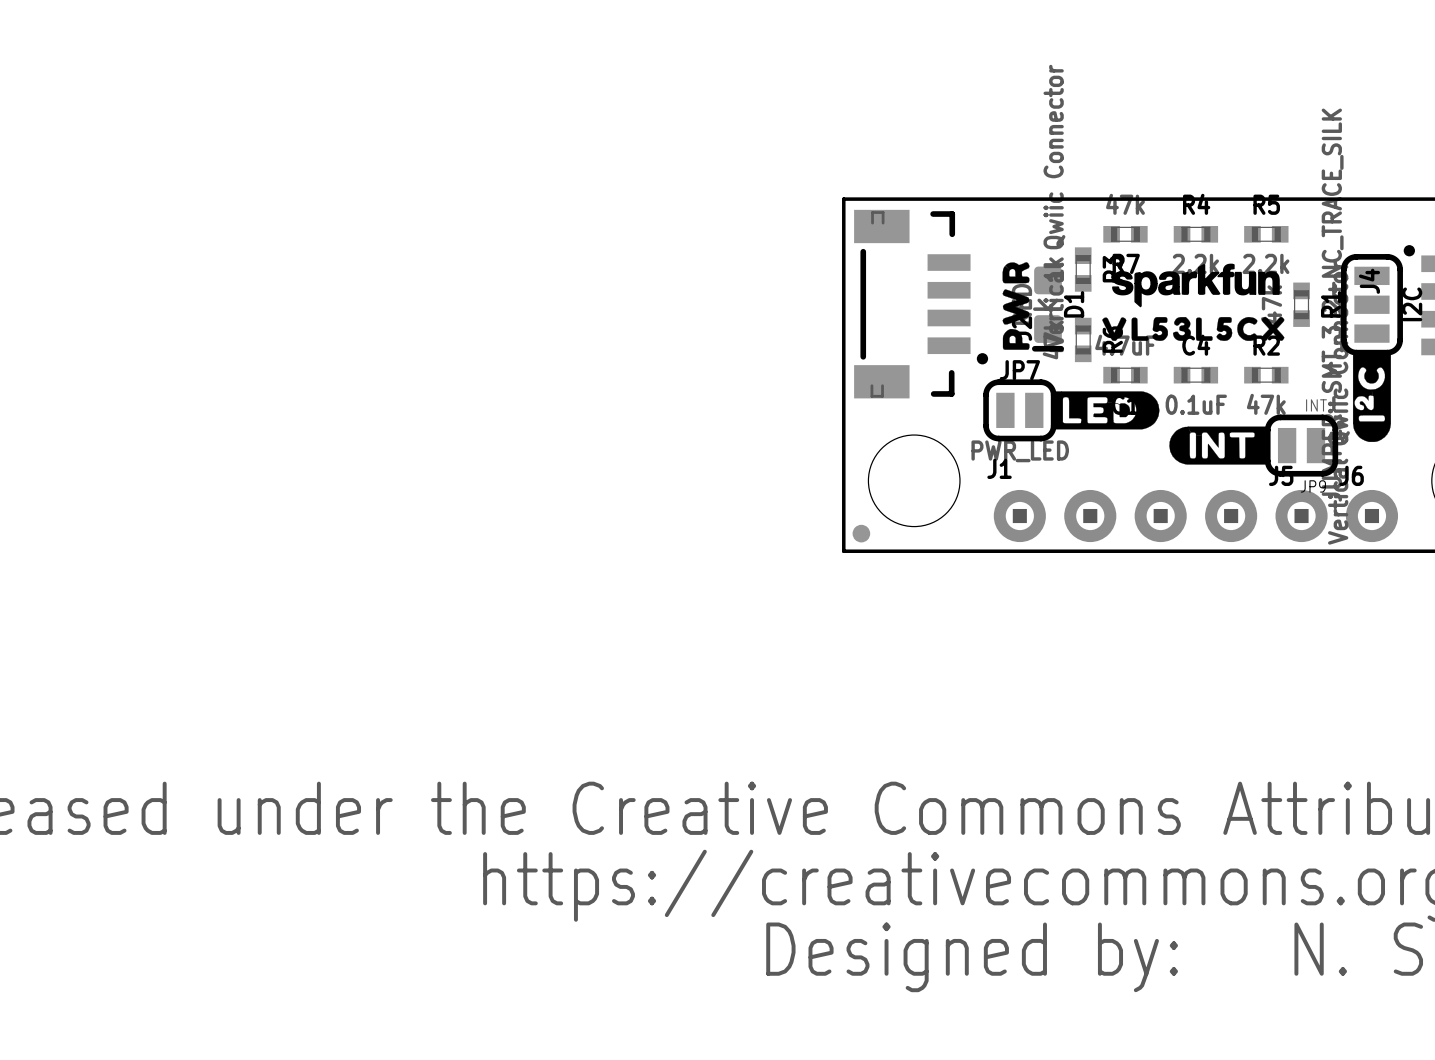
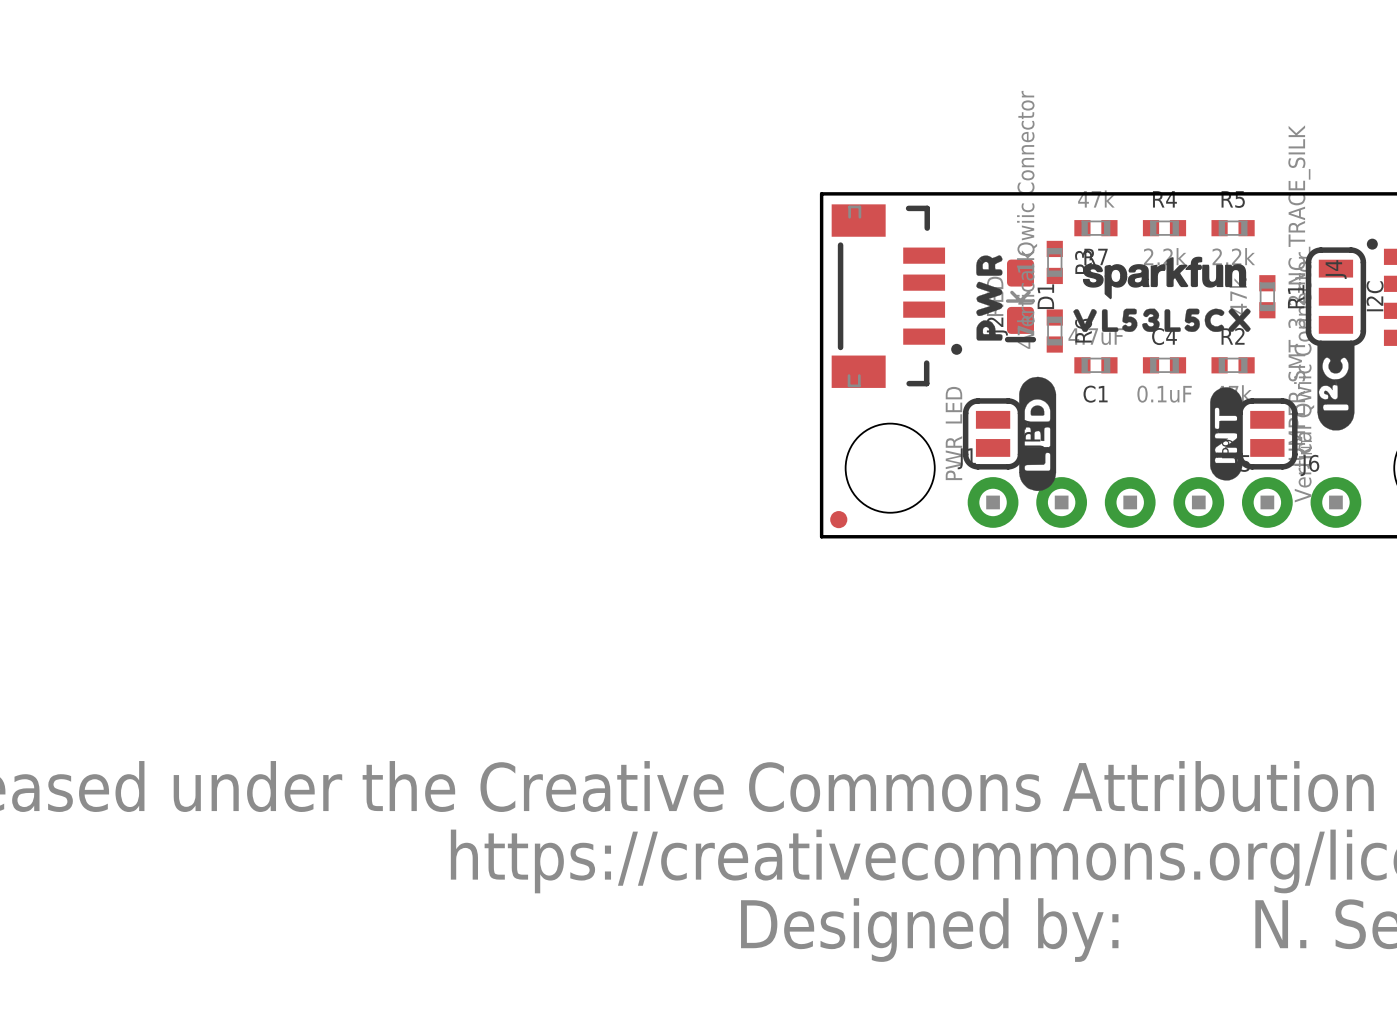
drawing: none -> [1019, 376, 1057, 491]
drawing: [1051, 391, 1270, 465] -> none
drawing: none -> [1210, 387, 1243, 481]
JP7 rotation: 0° (1019, 410) -> 90° clockwise (993, 433)
JP9 rotation: 0° (1301, 445) -> 90° clockwise (1267, 433)

